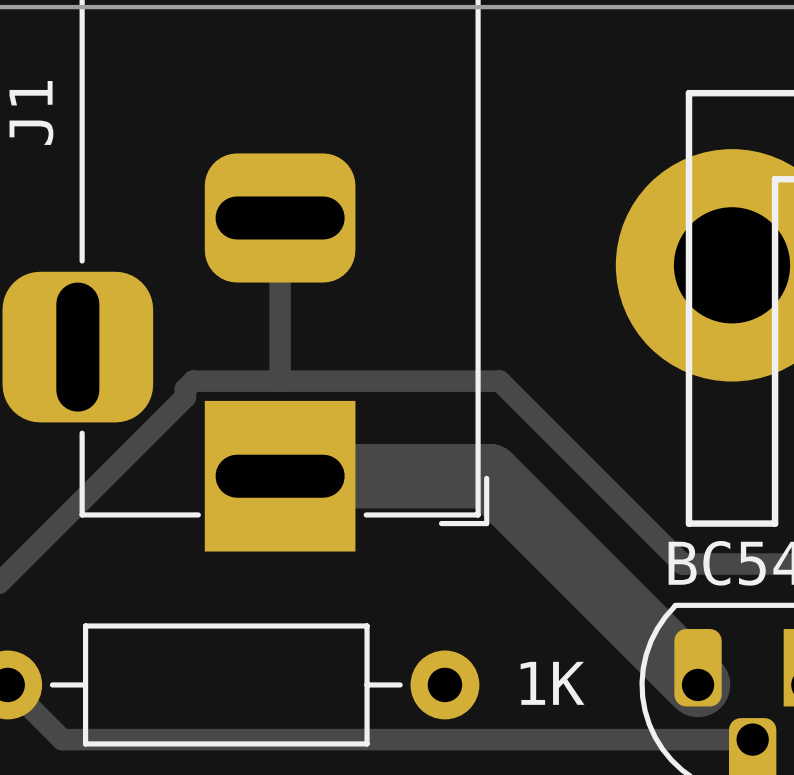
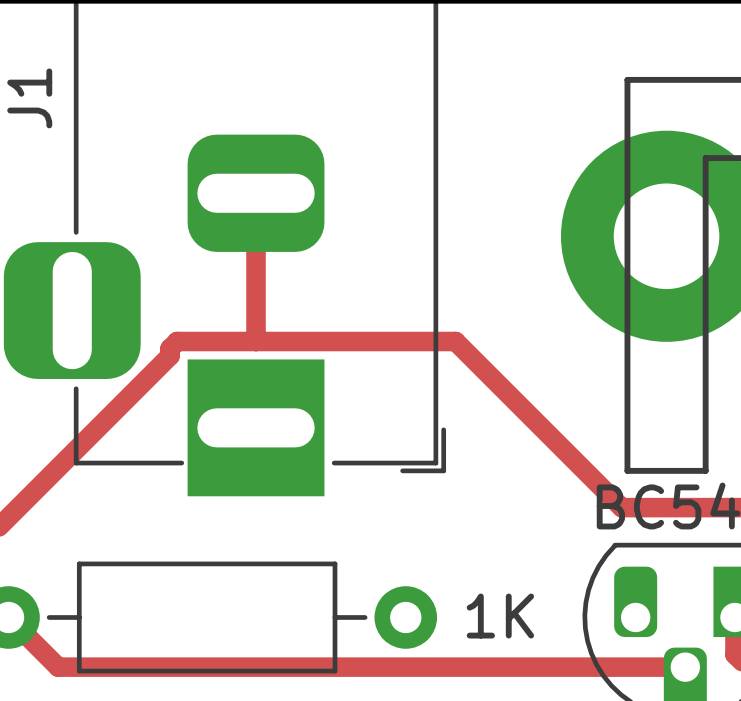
track: (280, 476) (489, 476) (698, 684) -> none

